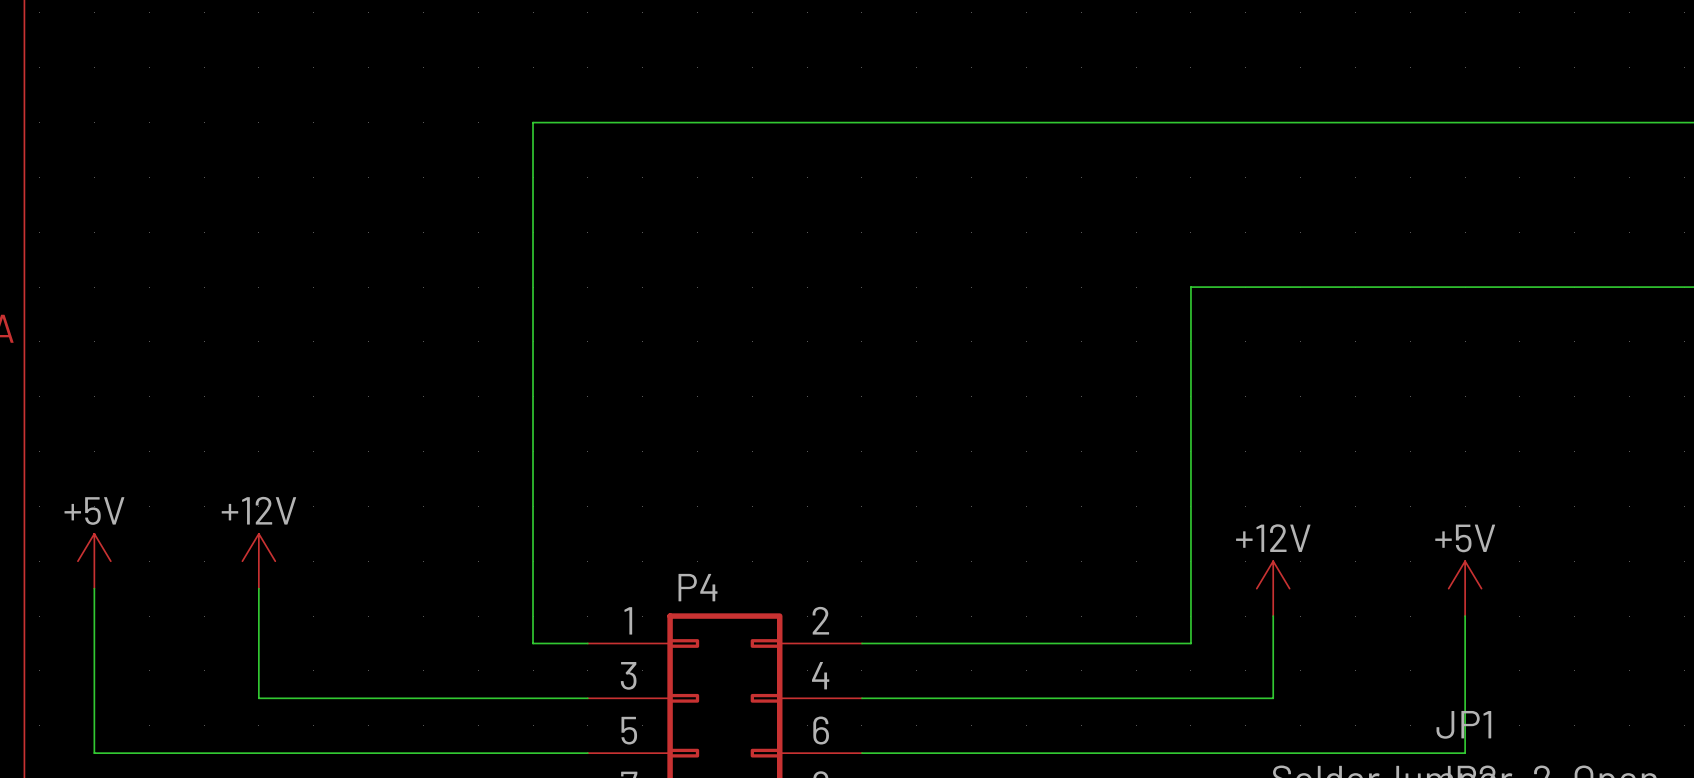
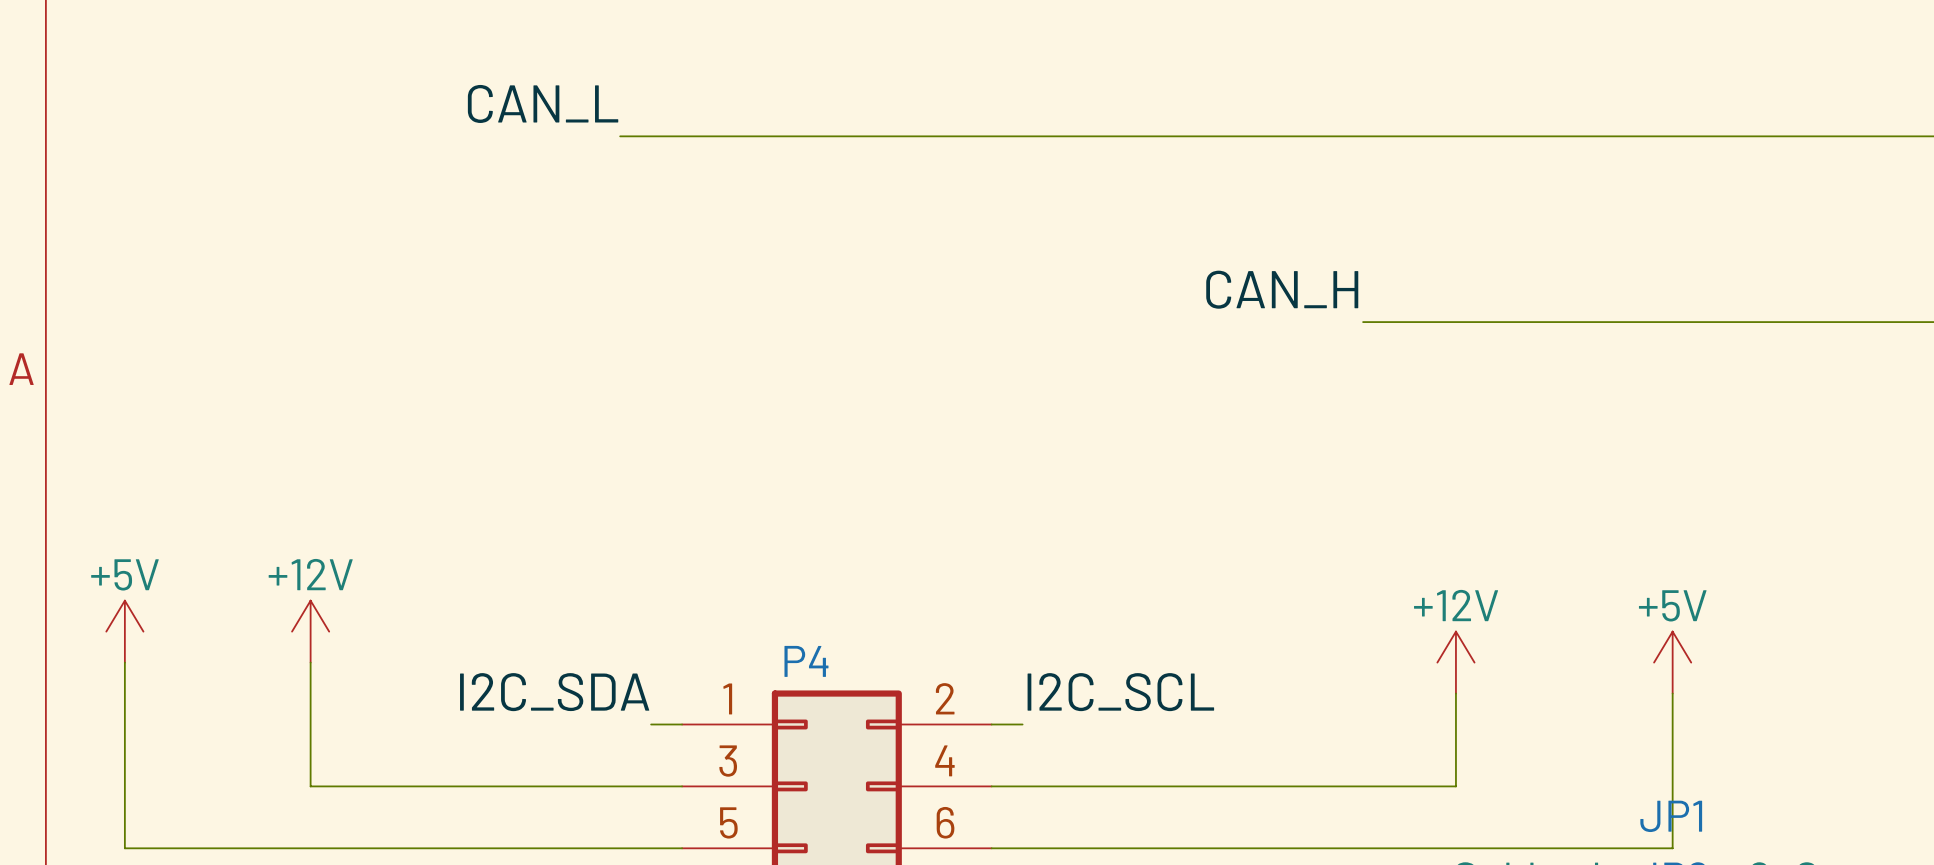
label: none -> CAN_L (543, 103)
wire: (533, 122) (533, 643) (560, 643) -> none
label: none -> CAN_H (1282, 289)
wire: (1190, 287) (1190, 643) (889, 643) -> none
label: none -> I2C_SDA (554, 692)
label: none -> I2C_SCL (1120, 692)

